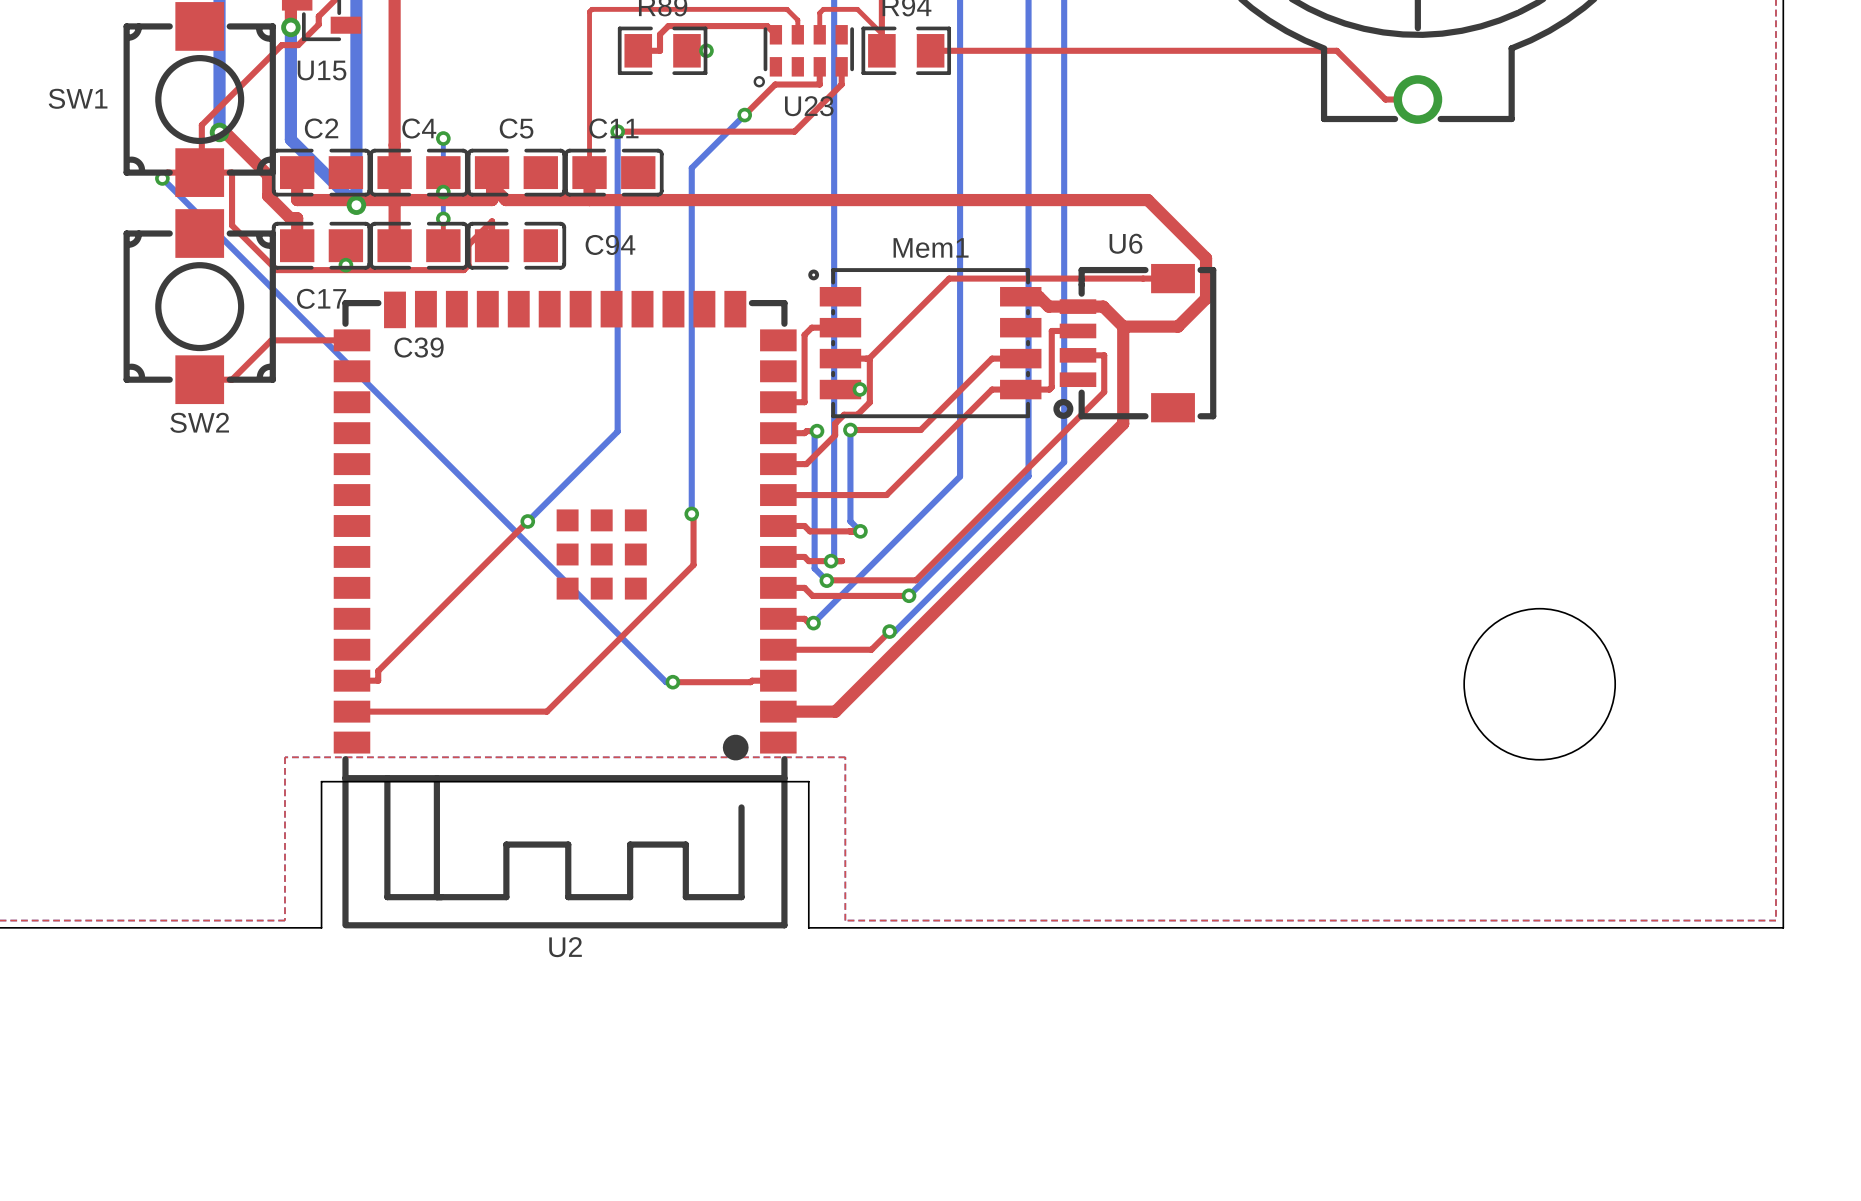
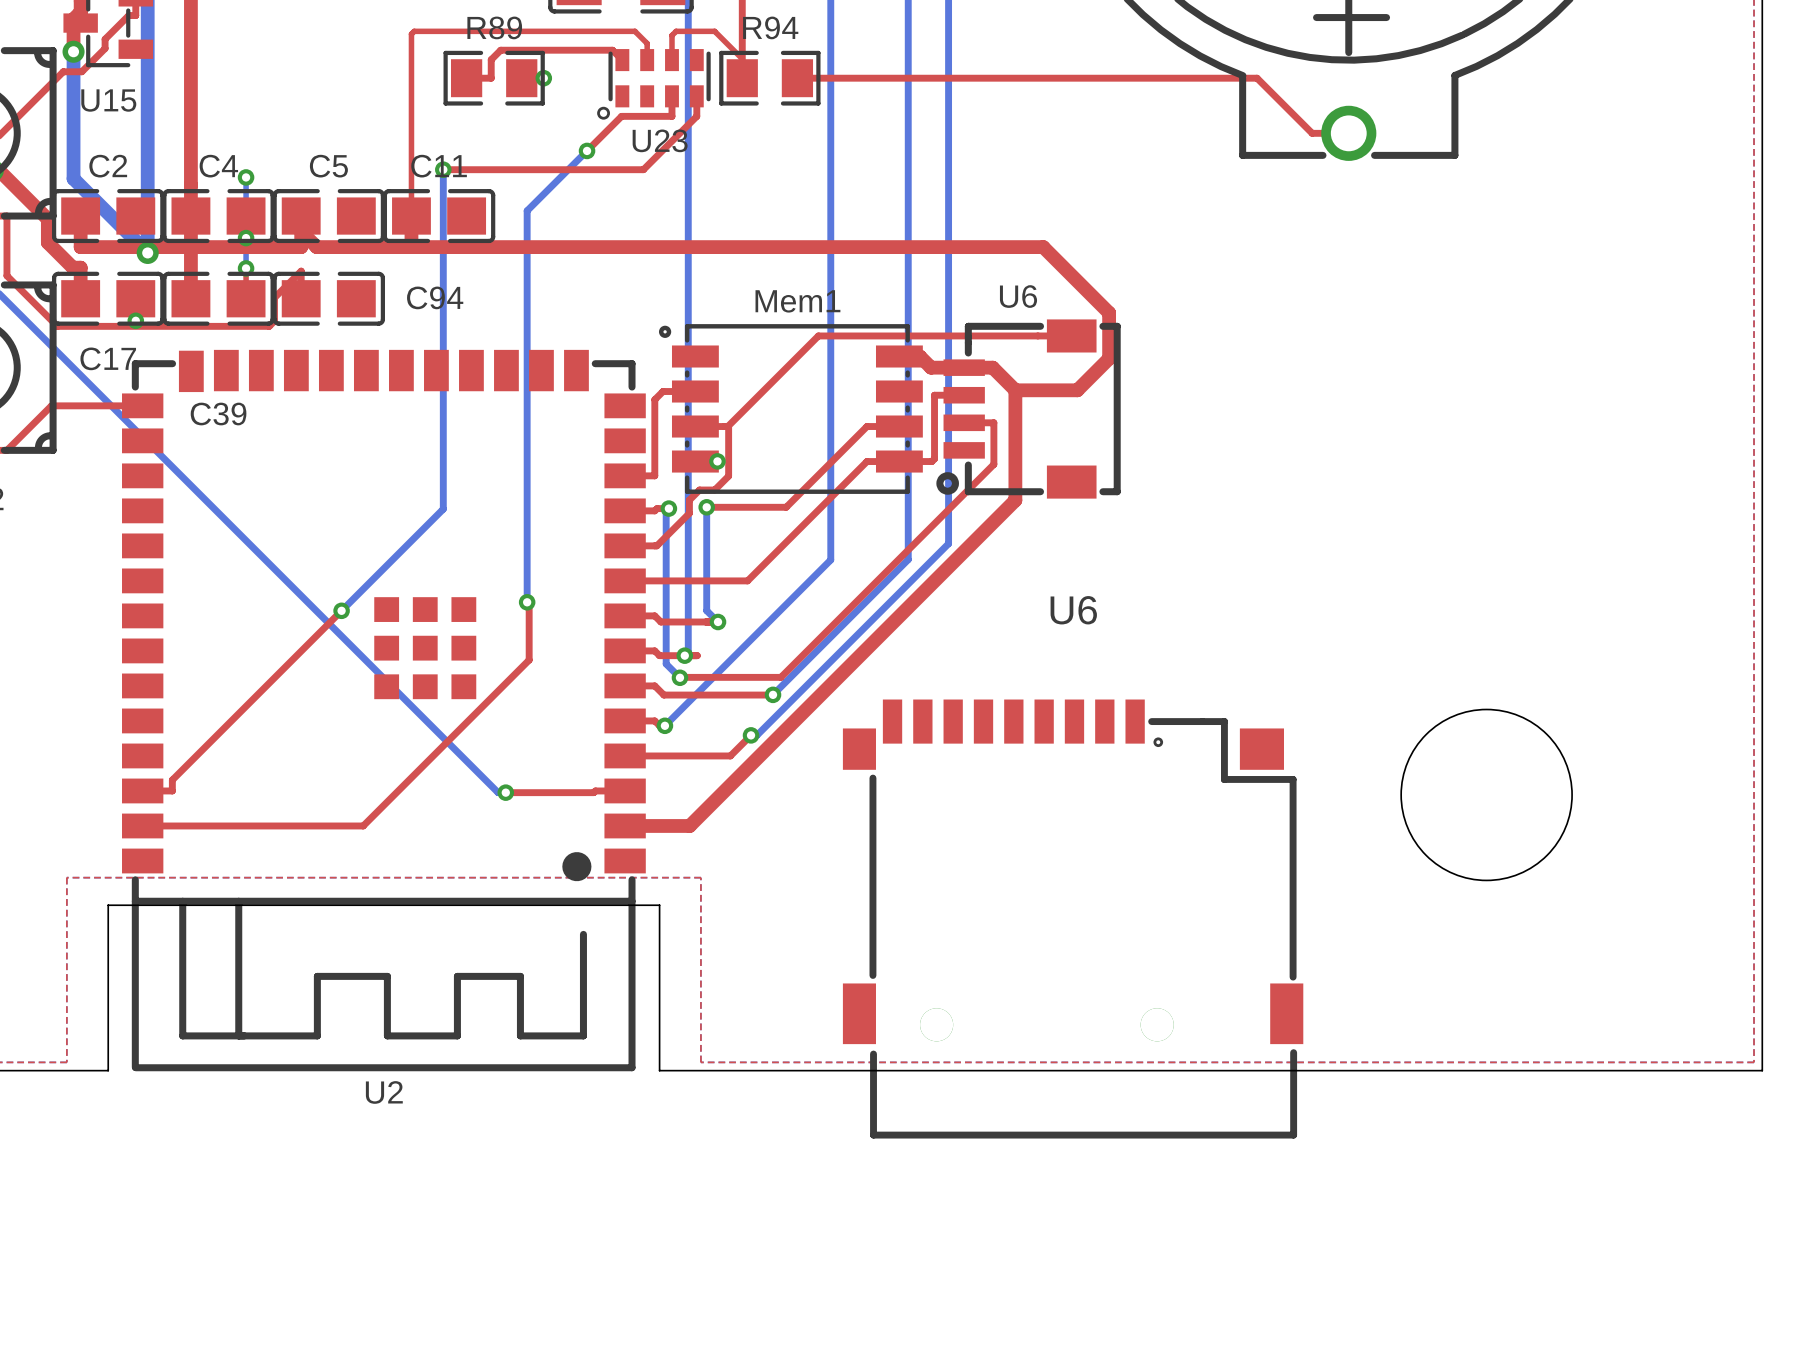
U6: none -> (1073, 919)

